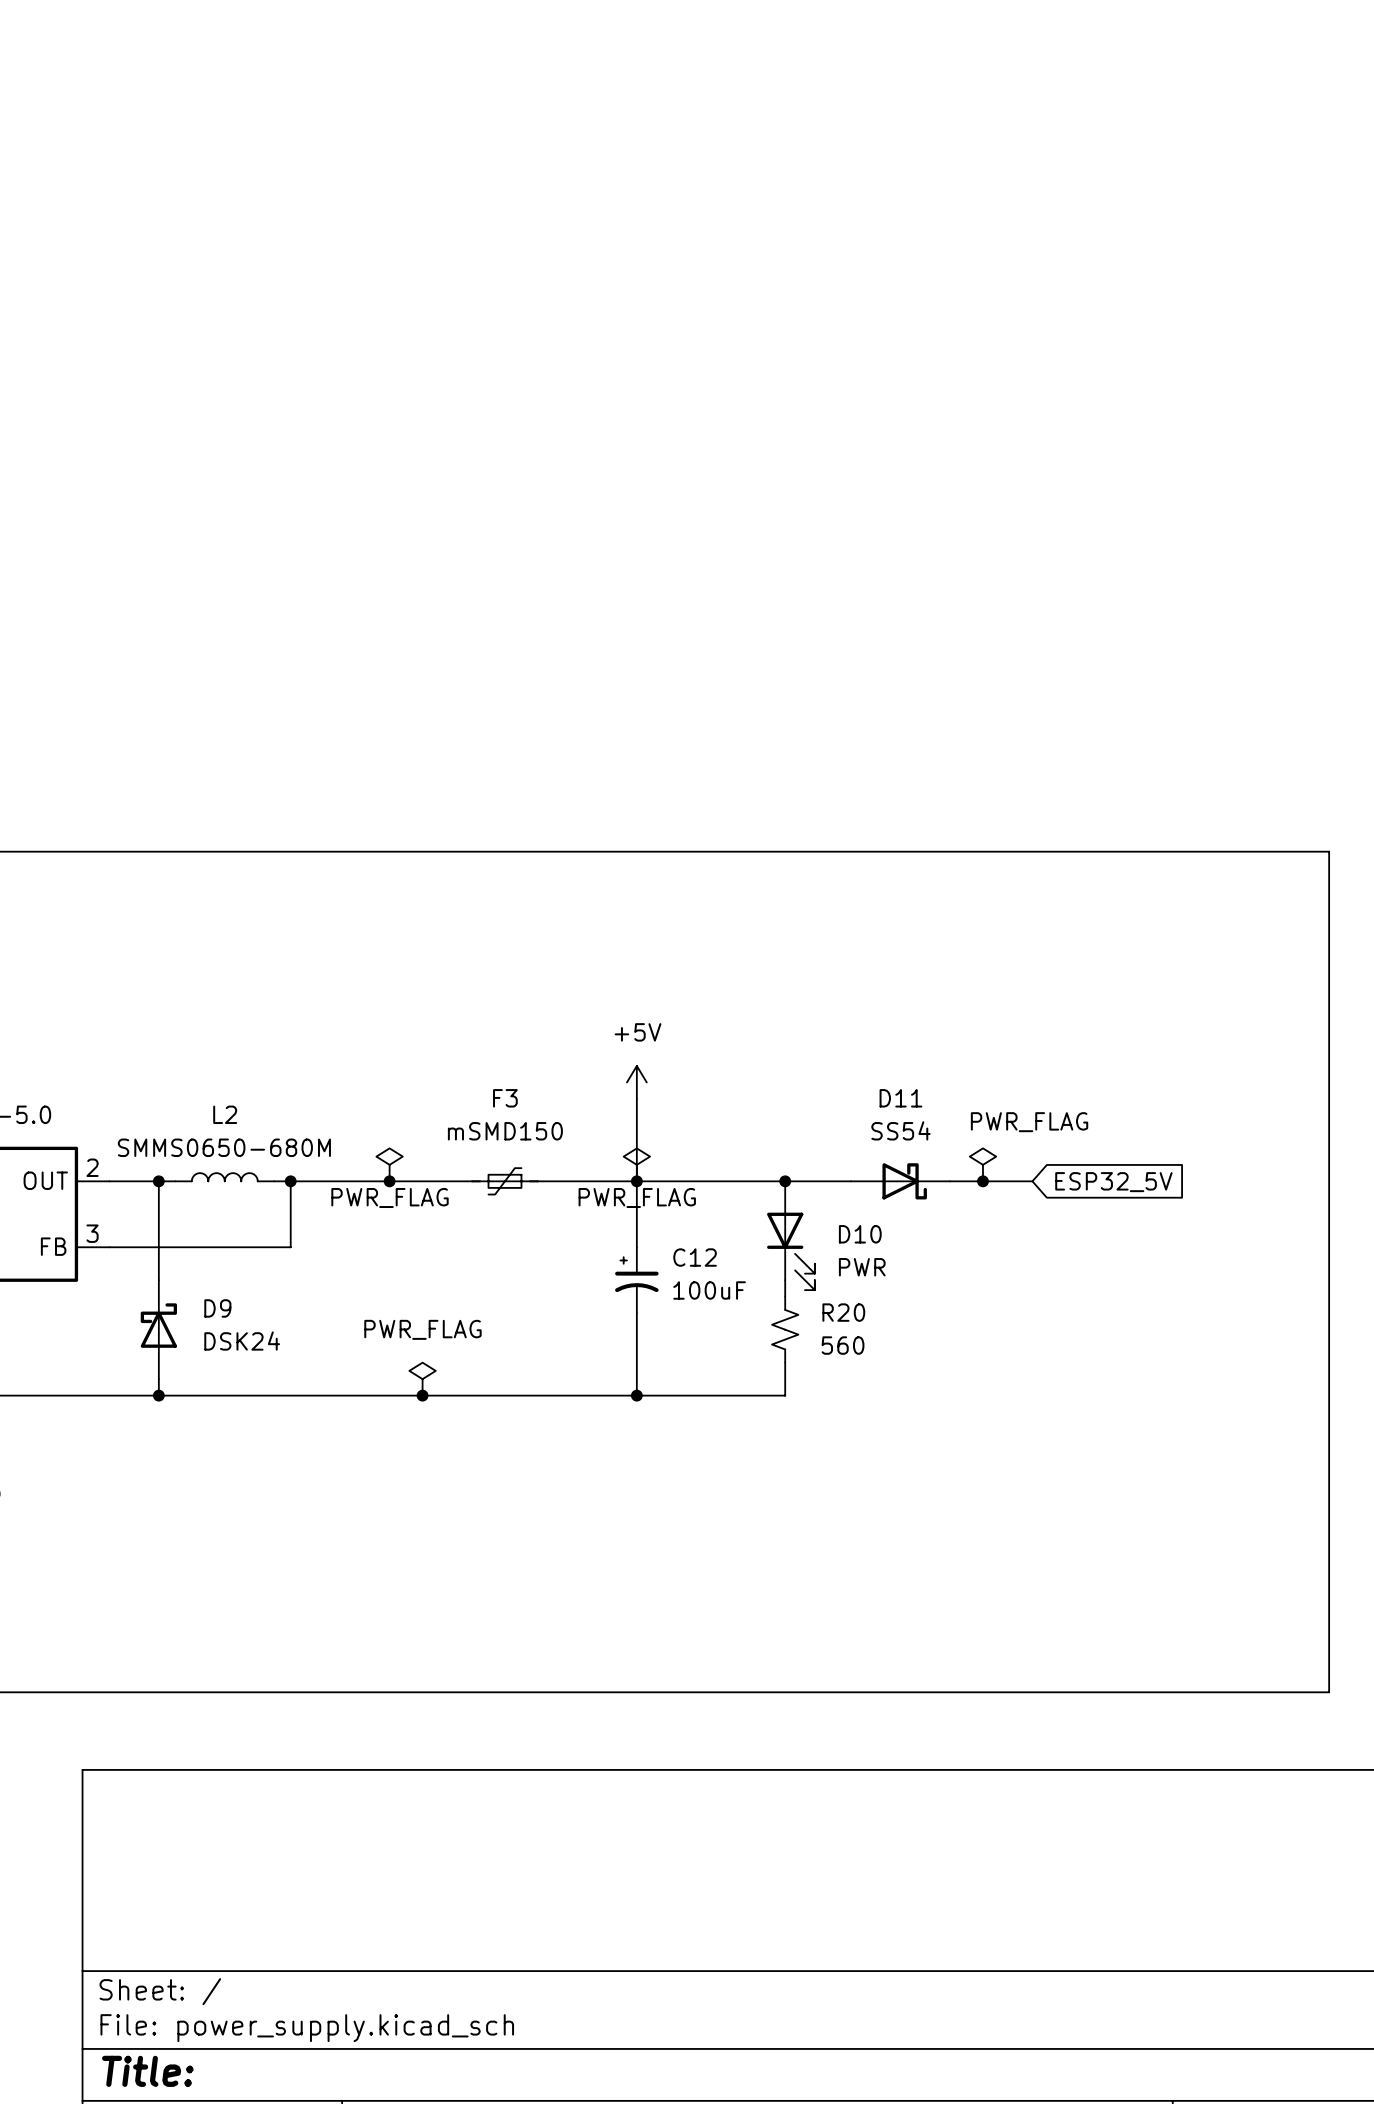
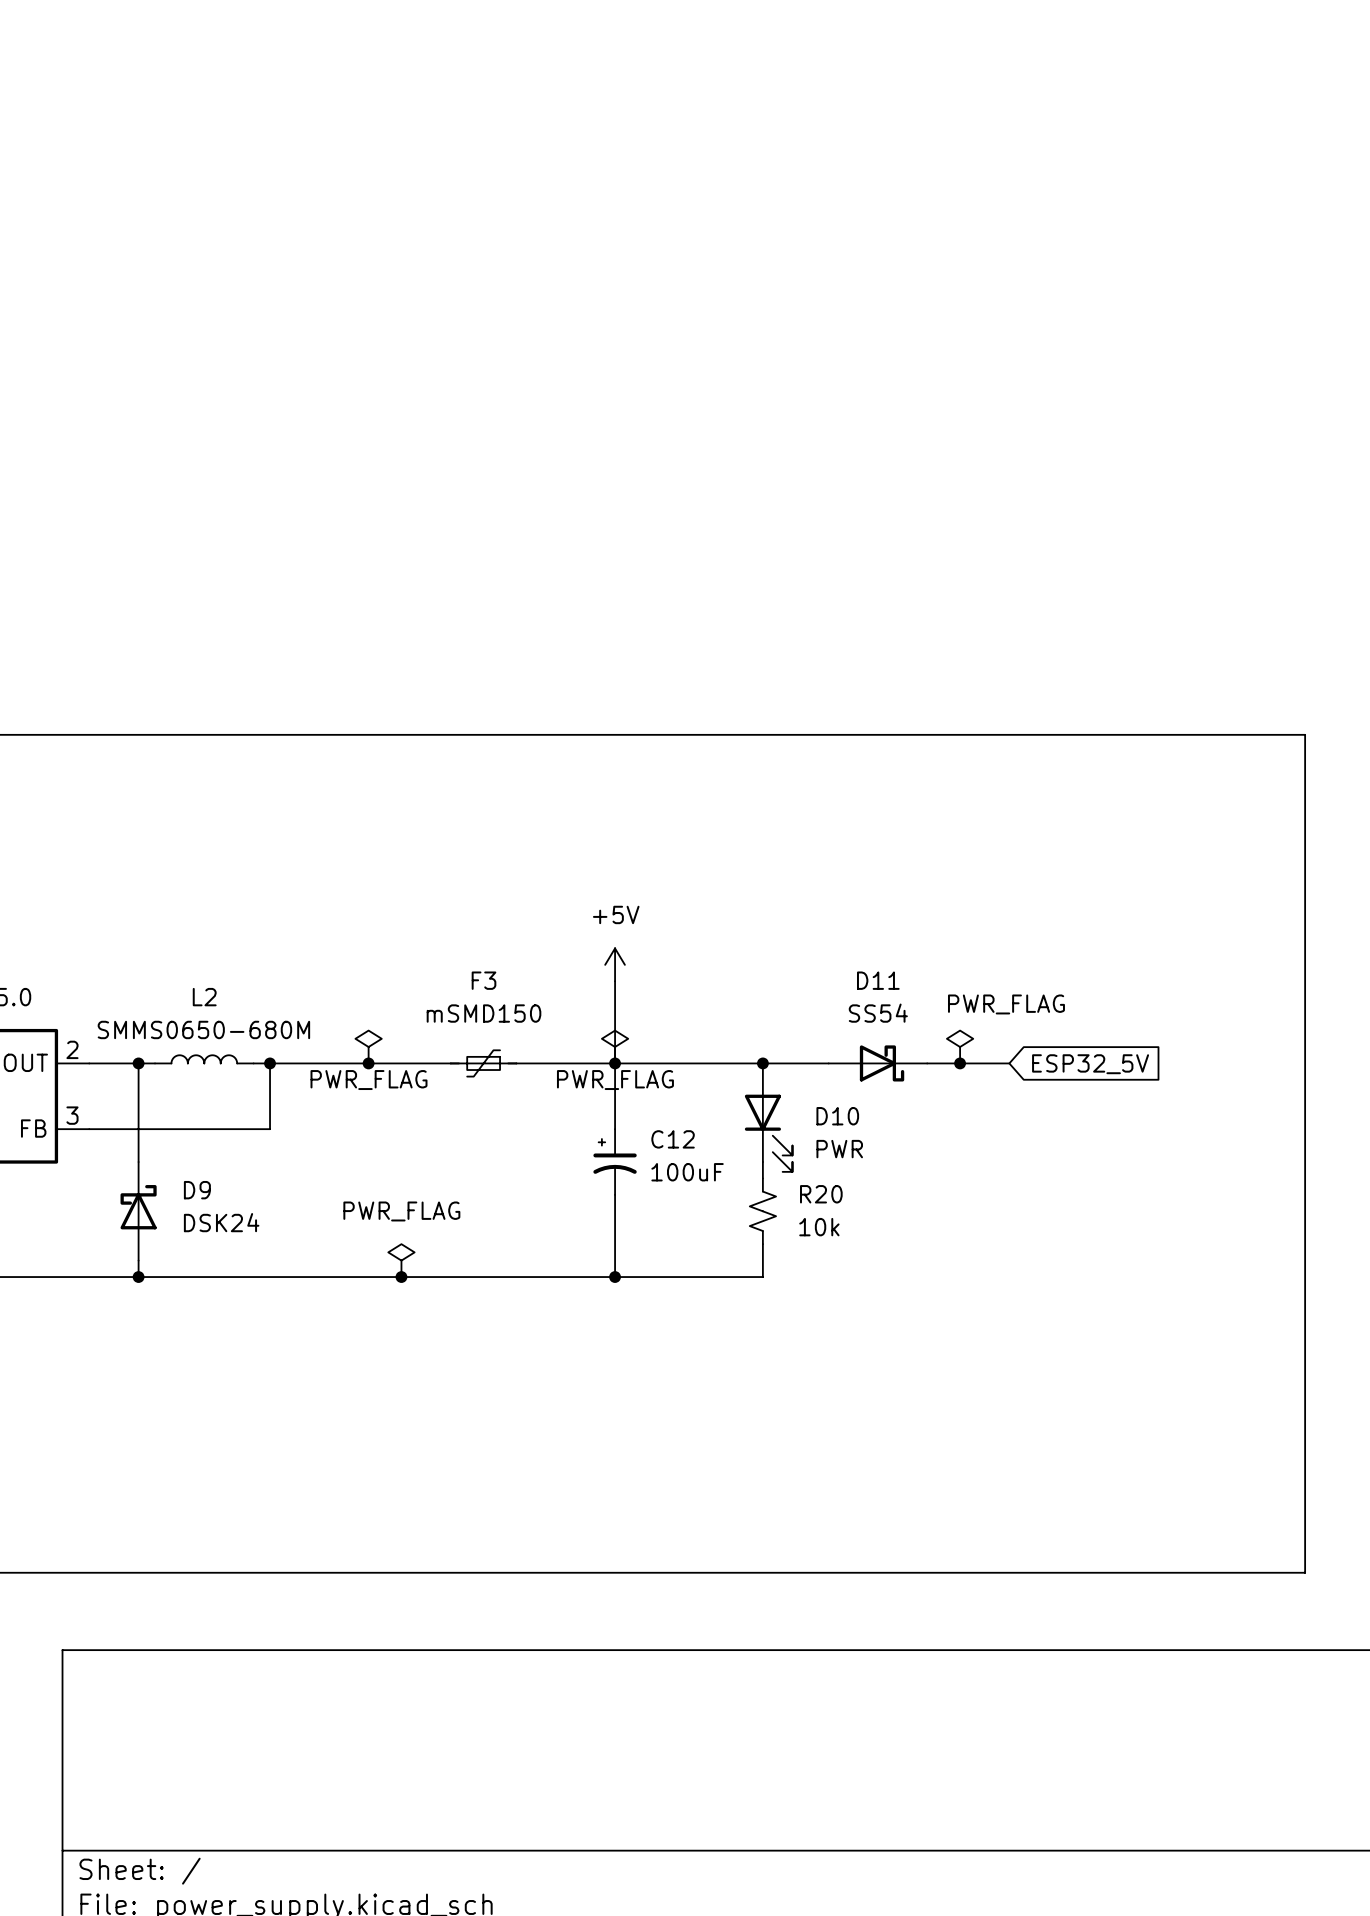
R20 value: 560 (843, 1345) -> 10k (819, 1227)

